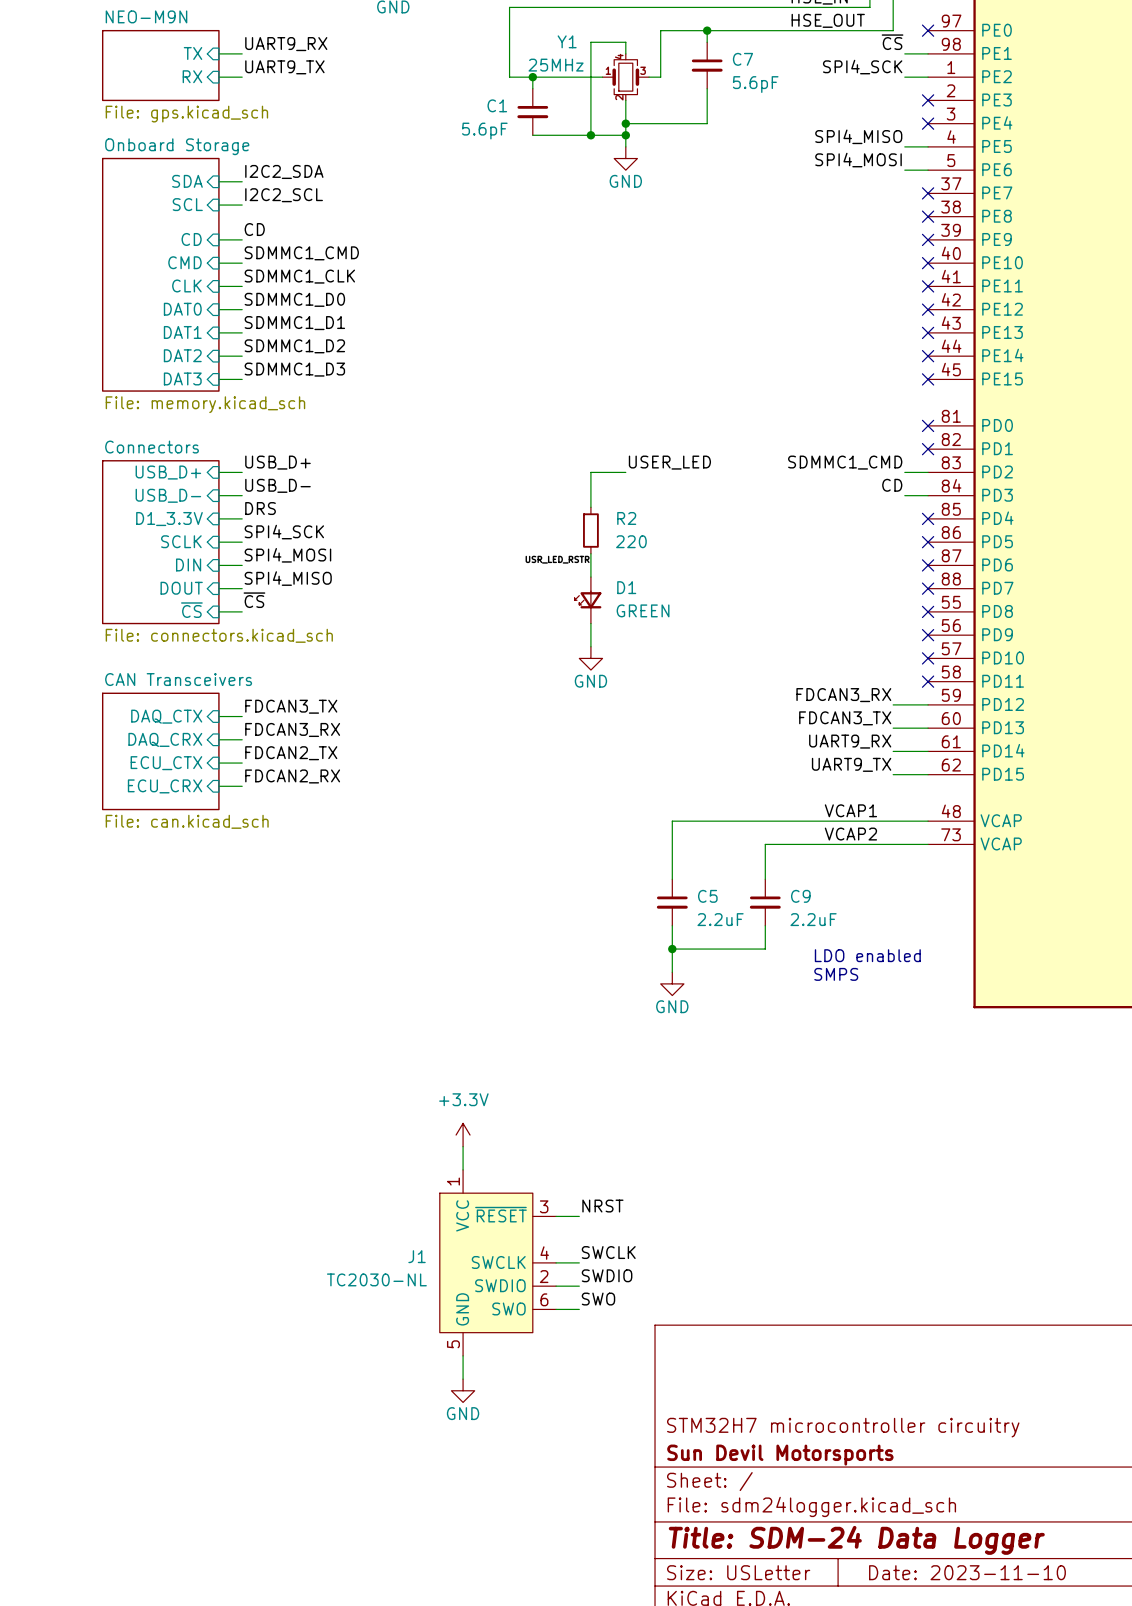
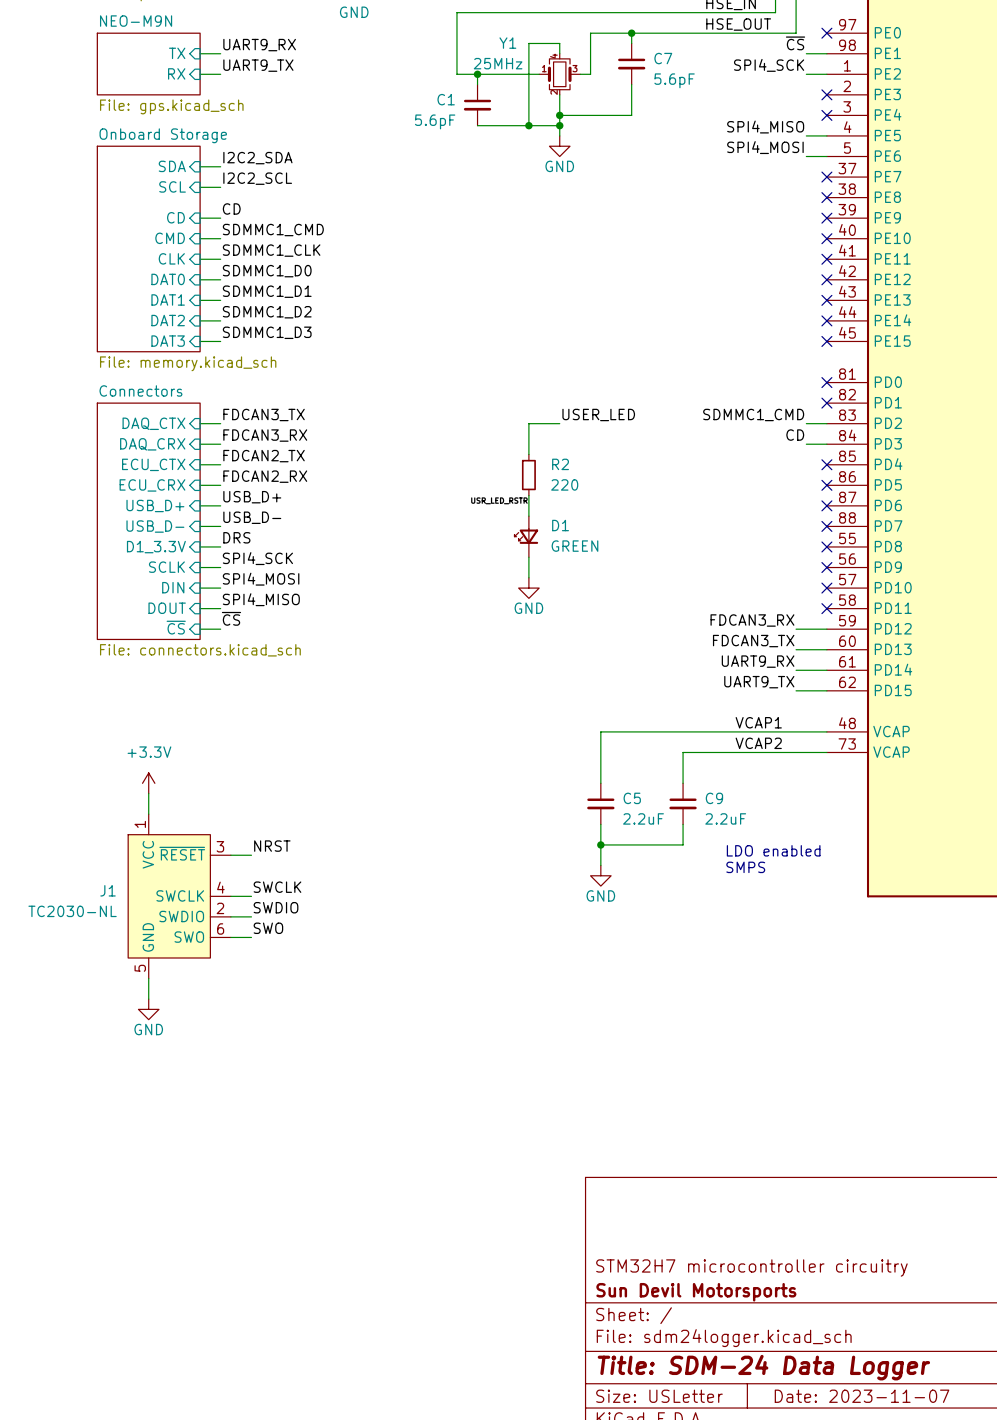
label: USB_D+ (277, 462) -> FDCAN3_TX (264, 414)
sheet pin: USB_D+ (168, 472) -> DAQ_CTX (153, 423)
label: USB_D- (277, 485) -> FDCAN3_RX (265, 435)
sheet pin: USB_D- (168, 495) -> DAQ_CRX (152, 444)
label: DRS (260, 508) -> FDCAN2_TX (264, 456)
sheet pin: D1_3.3V (169, 519) -> ECU_CTX (153, 464)
label: SPI4_SCK (284, 532) -> FDCAN2_RX (265, 476)
sheet pin: SCLK (181, 541) -> ECU_CRX (152, 485)
sheet Connectors: File: connectors.kicad_sch (160, 542) -> none
label: SPI4_MOSI (287, 555) -> USB_D+ (252, 497)
sheet pin: DIN (188, 564) -> USB_D+ (155, 505)
label: SPI4_MISO (288, 578) -> USB_D- (252, 517)
sheet Connectors: none -> File: connectors.kicad_sch (148, 521)
sheet pin: DOUT (181, 588) -> USB_D- (155, 526)
label: ~{CS} (254, 600) -> DRS (236, 537)
sheet pin: ~{CS} (191, 610) -> D1_3.3V (156, 547)
label: none -> SPI4_SCK (257, 558)
sheet pin: none -> SCLK (166, 567)
label: none -> SPI4_MOSI (261, 579)
sheet pin: none -> DIN (173, 587)
label: none -> SPI4_MISO (261, 599)
sheet pin: none -> DOUT (167, 608)
label: none -> ~{CS} (231, 618)
sheet pin: none -> ~{CS} (176, 627)
label: FDCAN3_TX (291, 706) -> none
sheet pin: DAQ_CTX (166, 716) -> none
wire: (218, 716) (242, 716) -> (200, 567) (220, 567)
label: FDCAN3_RX (292, 729) -> none
sheet pin: DAQ_CRX (165, 739) -> none
wire: (218, 739) (242, 739) -> (200, 588) (220, 588)
sheet CAN Transceivers: File: can.kicad_sch (160, 751) -> none
label: FDCAN2_TX (291, 753) -> none
sheet pin: ECU_CTX (166, 763) -> none
wire: (218, 763) (242, 763) -> (200, 608) (220, 608)
label: FDCAN2_RX (292, 776) -> none
sheet pin: ECU_CRX (165, 786) -> none
wire: (218, 786) (242, 786) -> (200, 629) (220, 629)
power symbol: none -> +3.3V (148, 783)
wire: none -> (148, 793) (148, 814)
label: none -> NRST (272, 846)
wire: none -> (230, 855) (251, 855)
label: none -> SWCLK (277, 887)
wire: none -> (230, 896) (251, 896)
label: none -> SWDIO (276, 907)
wire: none -> (230, 916) (251, 916)
label: none -> SWO (268, 928)
wire: none -> (230, 937) (251, 937)
wire: none -> (148, 978) (148, 999)
power symbol: none -> GND (148, 1009)
power symbol: +3.3V (463, 1135) -> none
wire: (463, 1146) (463, 1169) -> none
label: NRST (602, 1206) -> none
wire: (556, 1216) (579, 1216) -> none
label: SWCLK (608, 1252) -> none
J1 position: (497, 1262) -> (179, 896)
wire: (556, 1262) (579, 1262) -> none
label: SWDIO (607, 1275) -> none
wire: (556, 1286) (579, 1286) -> none
label: SWO (598, 1299) -> none
wire: (556, 1309) (579, 1309) -> none
wire: (463, 1355) (463, 1379) -> none
power symbol: GND (463, 1390) -> none
title block: Date: 2023-11-10 (967, 1572) -> Date: 2023-11-07 (862, 1396)

